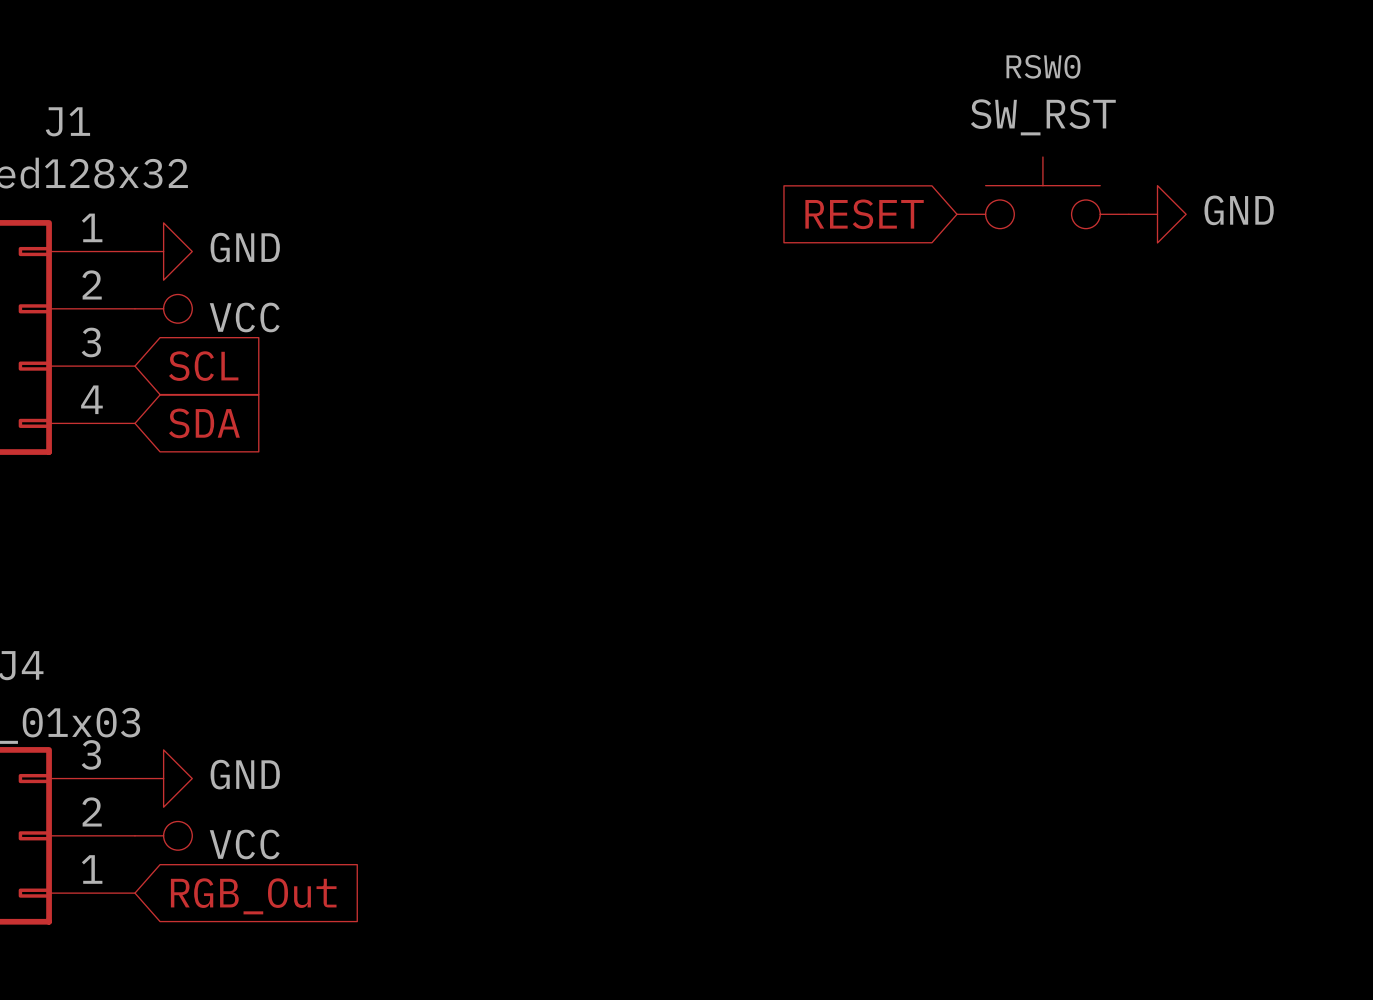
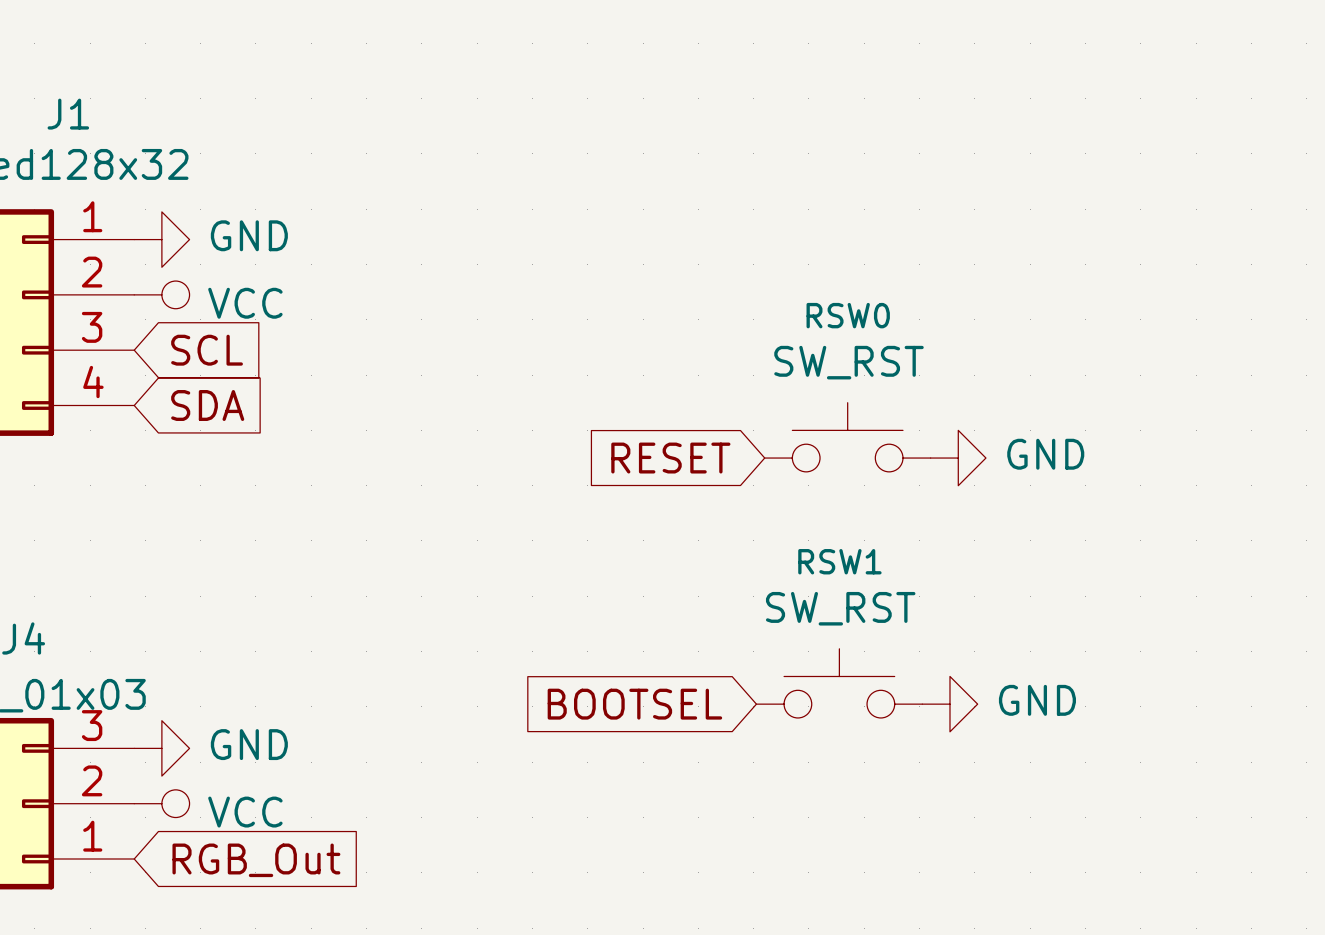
RSW0 position: (1042, 192) -> (847, 437)
global label position: RESET (864, 214) -> RESET (670, 458)
power symbol: GND (1157, 214) -> none
power symbol: none -> GND (958, 458)
RSW1: none -> SW_RST (839, 683)
global label: none -> BOOTSEL (634, 704)
power symbol: none -> GND (949, 704)

